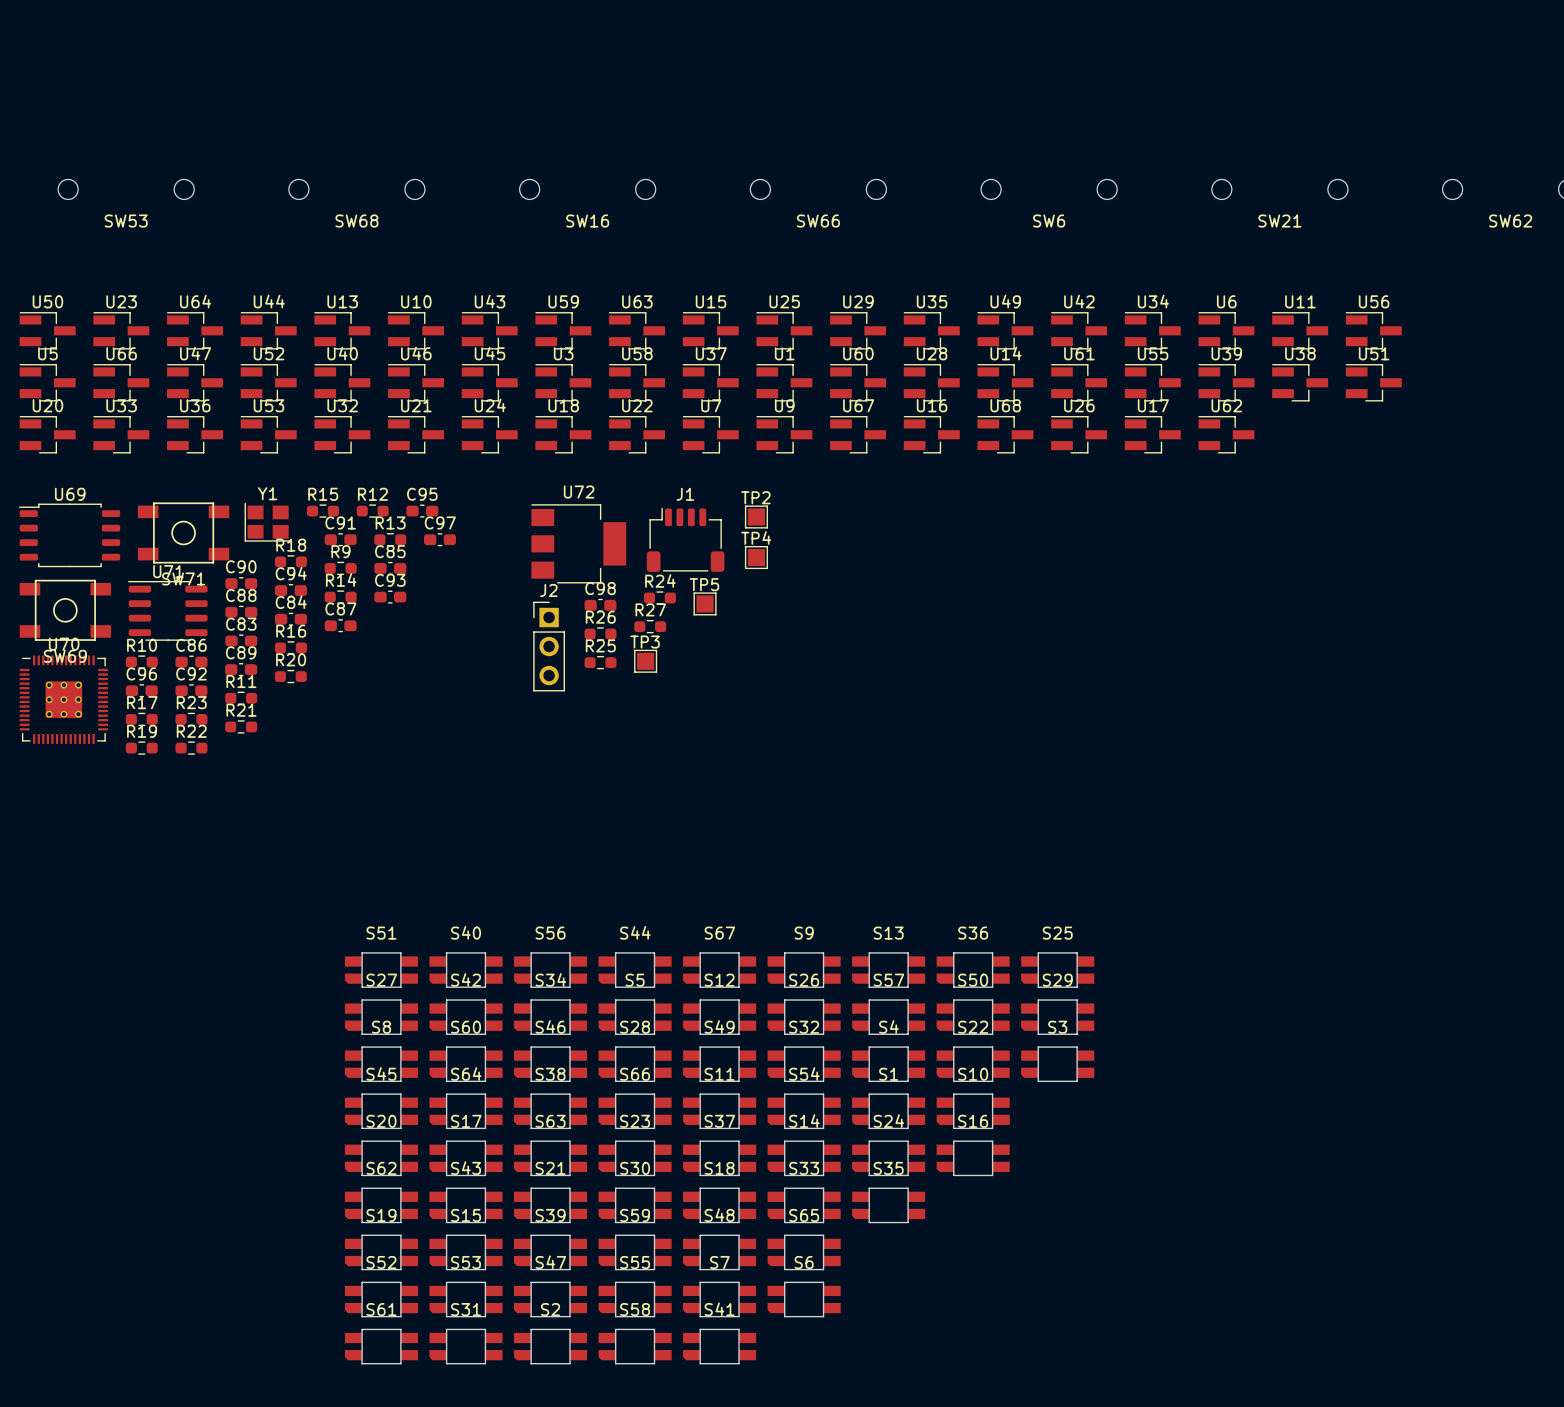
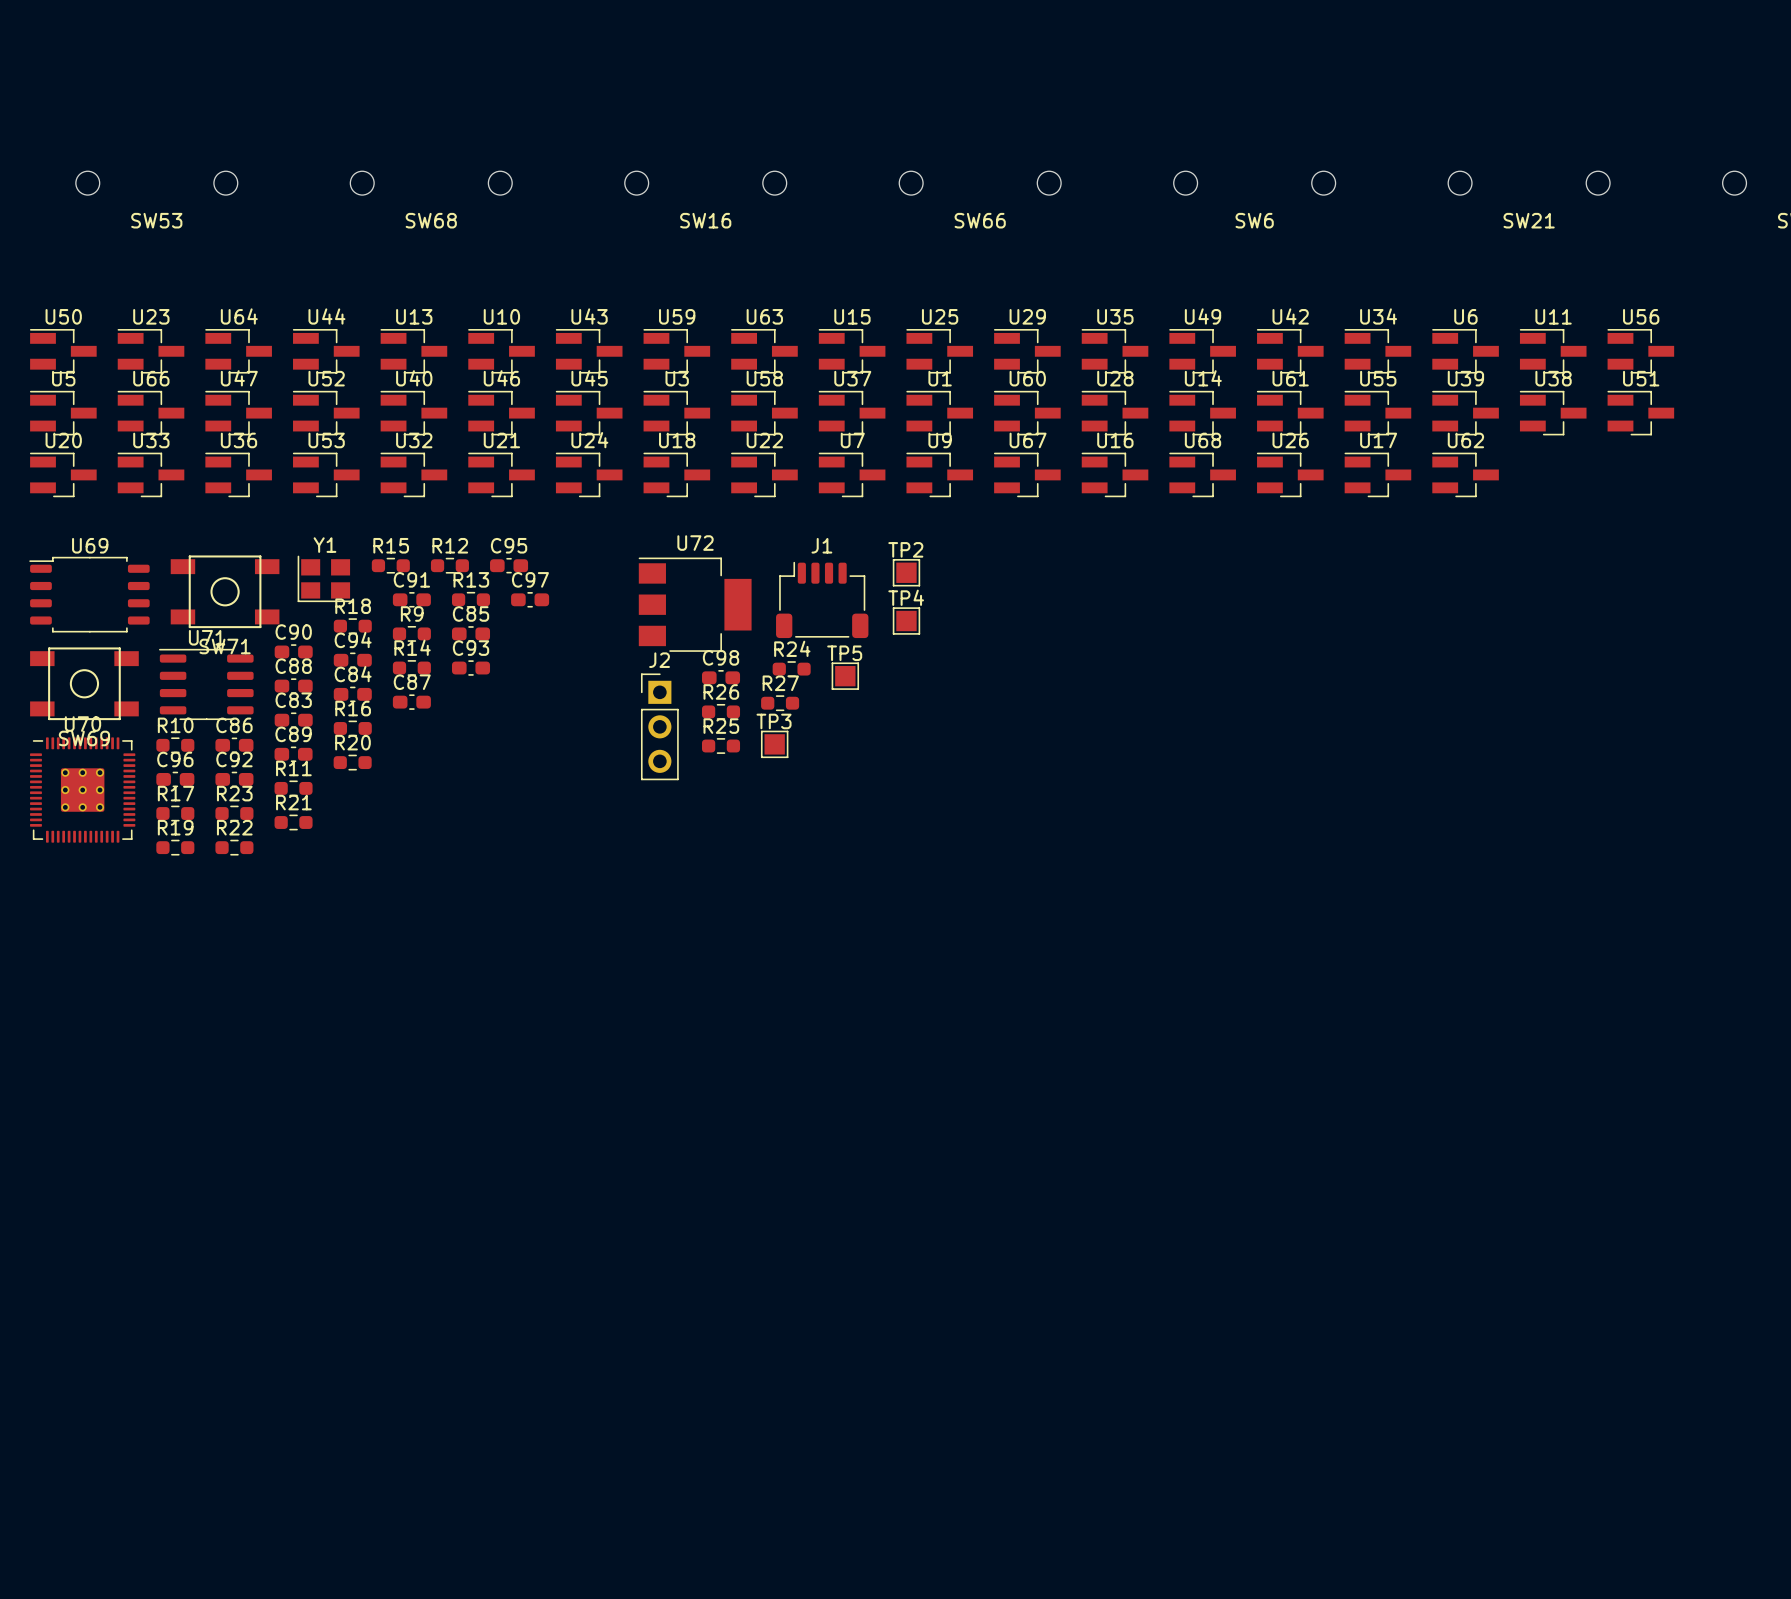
S51: (381, 970) -> none
S40: (466, 970) -> none
S56: (550, 970) -> none
S44: (635, 970) -> none
S67: (719, 970) -> none
S9: (804, 970) -> none
S13: (888, 970) -> none
S36: (973, 970) -> none
S25: (1057, 970) -> none
S27: (381, 1017) -> none
S42: (466, 1017) -> none
S34: (550, 1017) -> none
S5: (635, 1017) -> none
S12: (719, 1017) -> none
S26: (804, 1017) -> none
S57: (888, 1017) -> none
S50: (973, 1017) -> none
S29: (1057, 1017) -> none
S8: (381, 1064) -> none
S60: (466, 1064) -> none
S46: (550, 1064) -> none
S28: (635, 1064) -> none
S49: (719, 1064) -> none
S32: (804, 1064) -> none
S4: (888, 1064) -> none
S22: (973, 1064) -> none
S3: (1057, 1064) -> none
S45: (381, 1111) -> none
S64: (466, 1111) -> none
S38: (550, 1111) -> none
S66: (635, 1111) -> none
S11: (719, 1111) -> none
S54: (804, 1111) -> none
S1: (888, 1111) -> none
S10: (973, 1111) -> none
S20: (381, 1158) -> none
S17: (466, 1158) -> none
S63: (550, 1158) -> none
S23: (635, 1158) -> none
S37: (719, 1158) -> none
S14: (804, 1158) -> none
S24: (888, 1158) -> none
S16: (973, 1158) -> none
S62: (381, 1205) -> none
S43: (466, 1205) -> none
S21: (550, 1205) -> none
S30: (635, 1205) -> none
S18: (719, 1205) -> none
S33: (804, 1205) -> none
S35: (888, 1205) -> none
S19: (381, 1252) -> none
S15: (466, 1252) -> none
S39: (550, 1252) -> none
S59: (635, 1252) -> none
S48: (719, 1252) -> none
S65: (804, 1252) -> none
S52: (381, 1299) -> none
S53: (466, 1299) -> none
S47: (550, 1299) -> none
S55: (635, 1299) -> none
S7: (719, 1299) -> none
S6: (804, 1299) -> none
S61: (381, 1346) -> none
S31: (466, 1346) -> none
S2: (550, 1346) -> none
S58: (635, 1346) -> none
S41: (719, 1346) -> none

